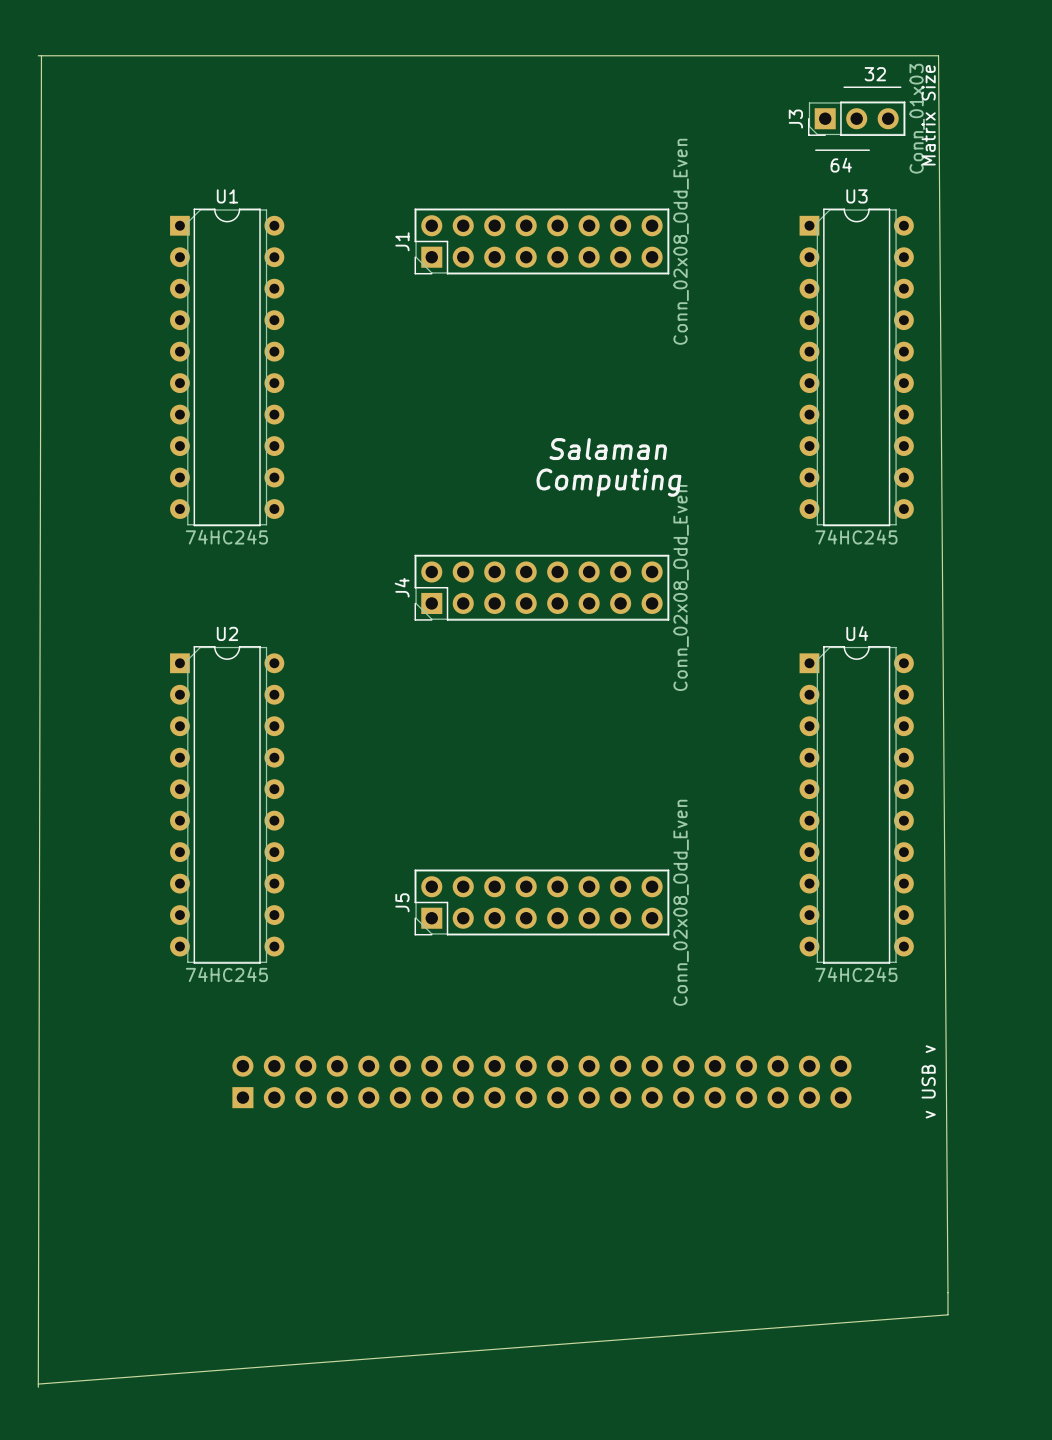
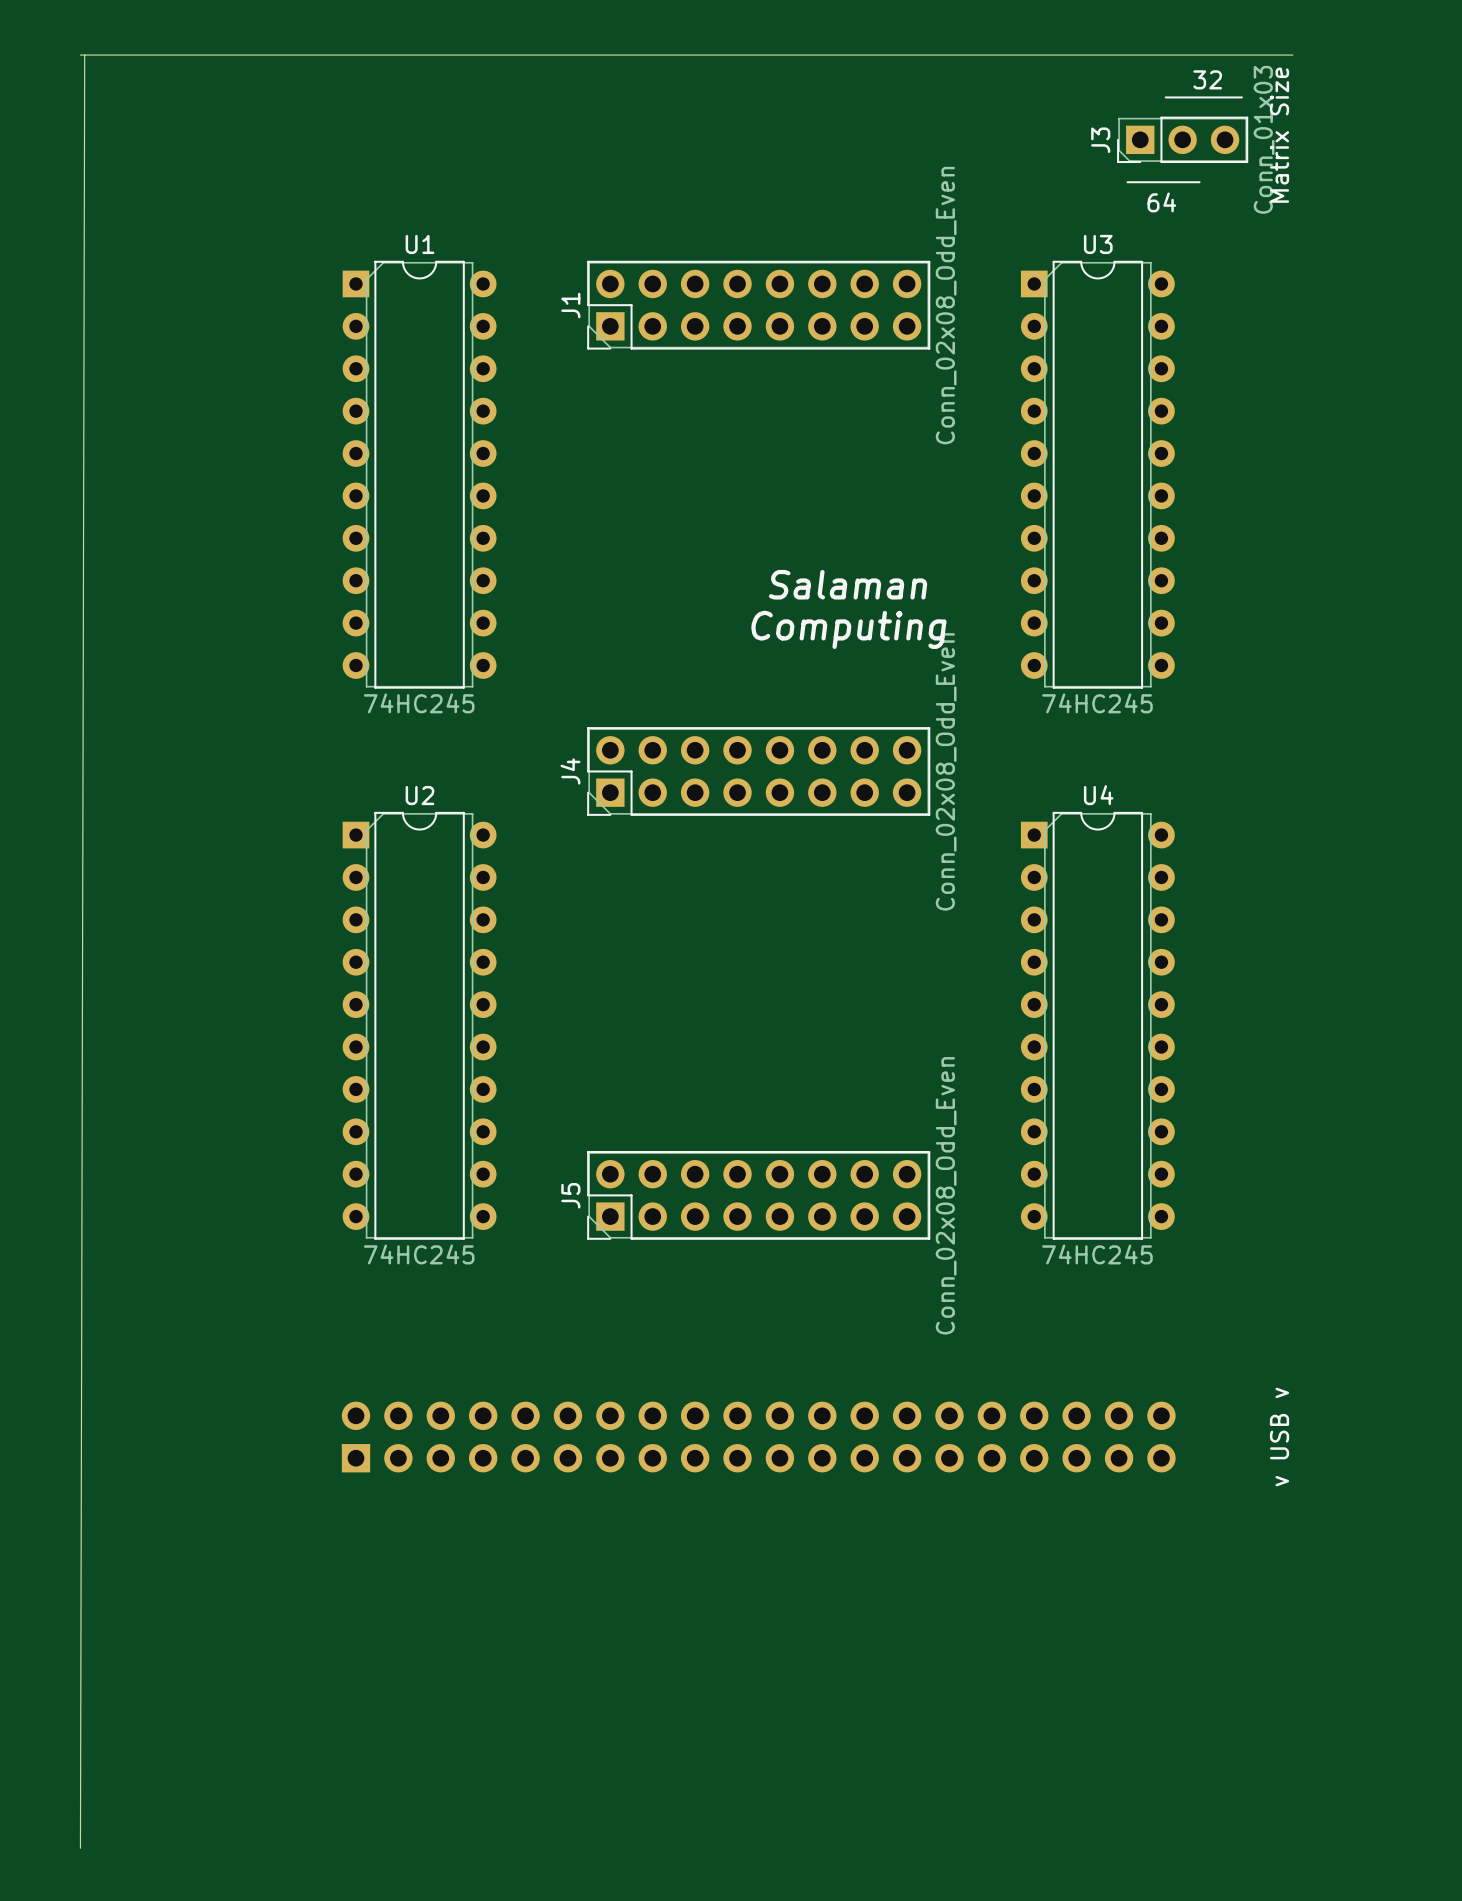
board edge: (938, 55) (947, 1314) (38, 1384) -> none
U1 position: (227, 367) -> (419, 474)
U3 position: (856, 367) -> (1097, 474)
U2 position: (227, 804) -> (419, 1025)
U4 position: (856, 804) -> (1097, 1025)

